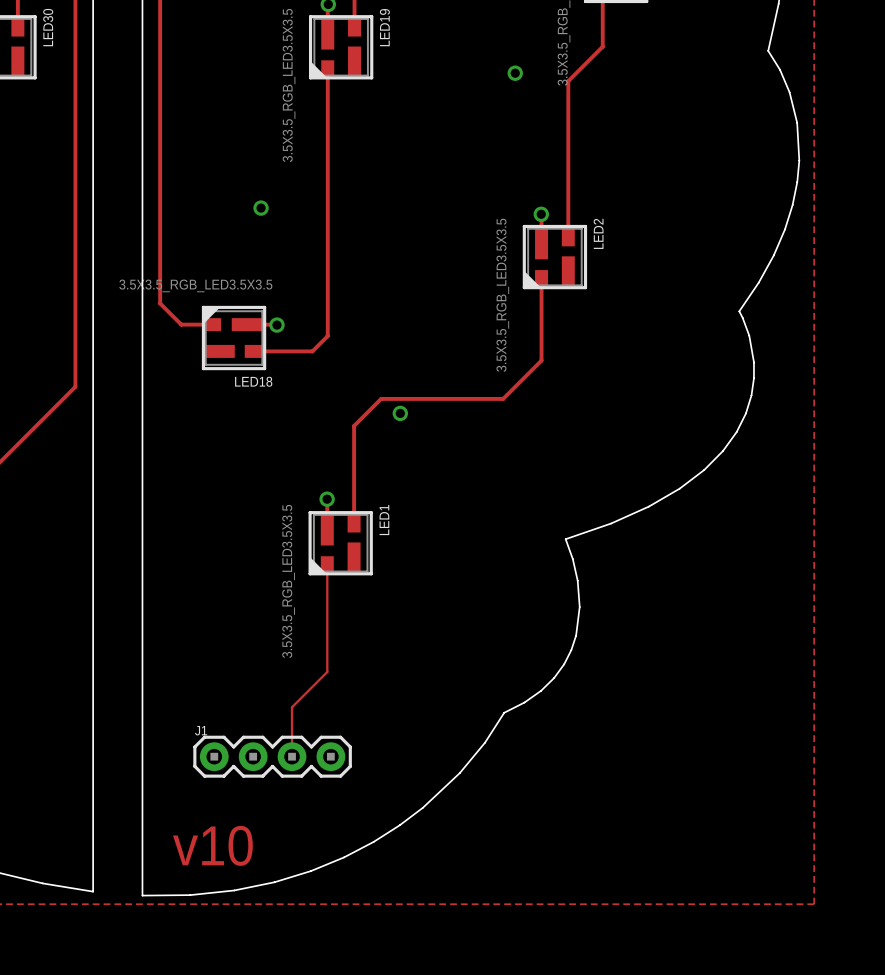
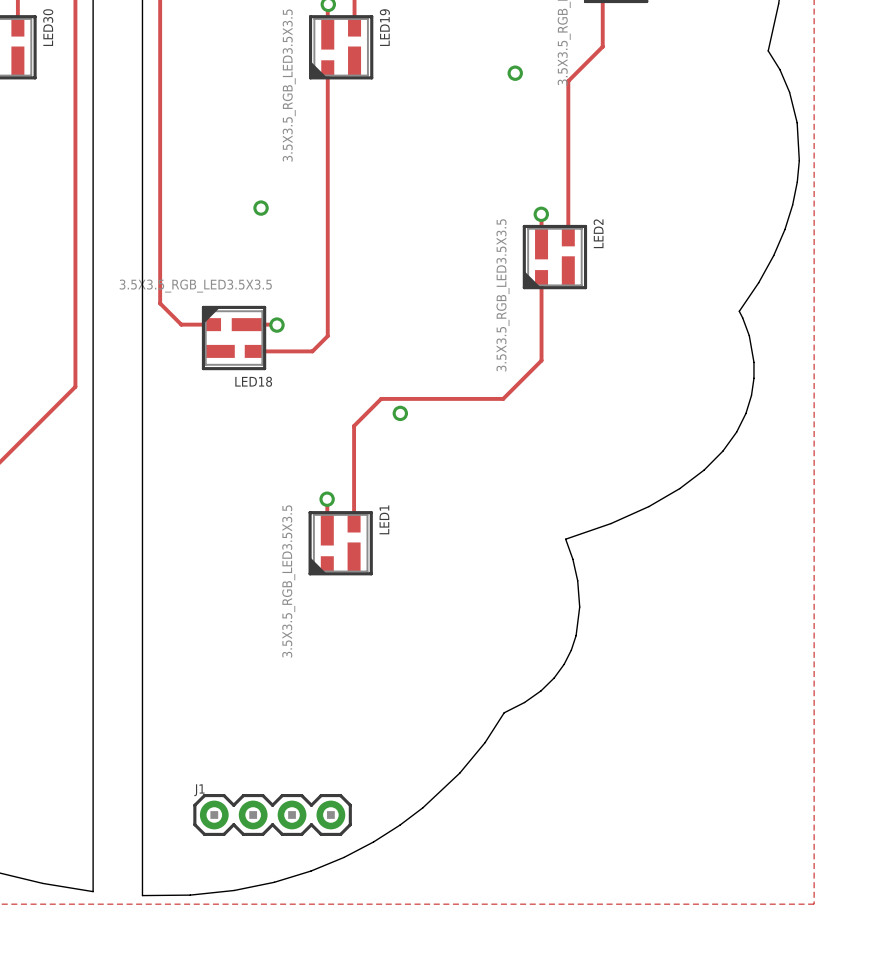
track: (327, 563) (327, 671) (292, 707) (292, 756) -> none
J1 position: (272, 756) -> (272, 814)
text: v10 (212, 845) -> none

